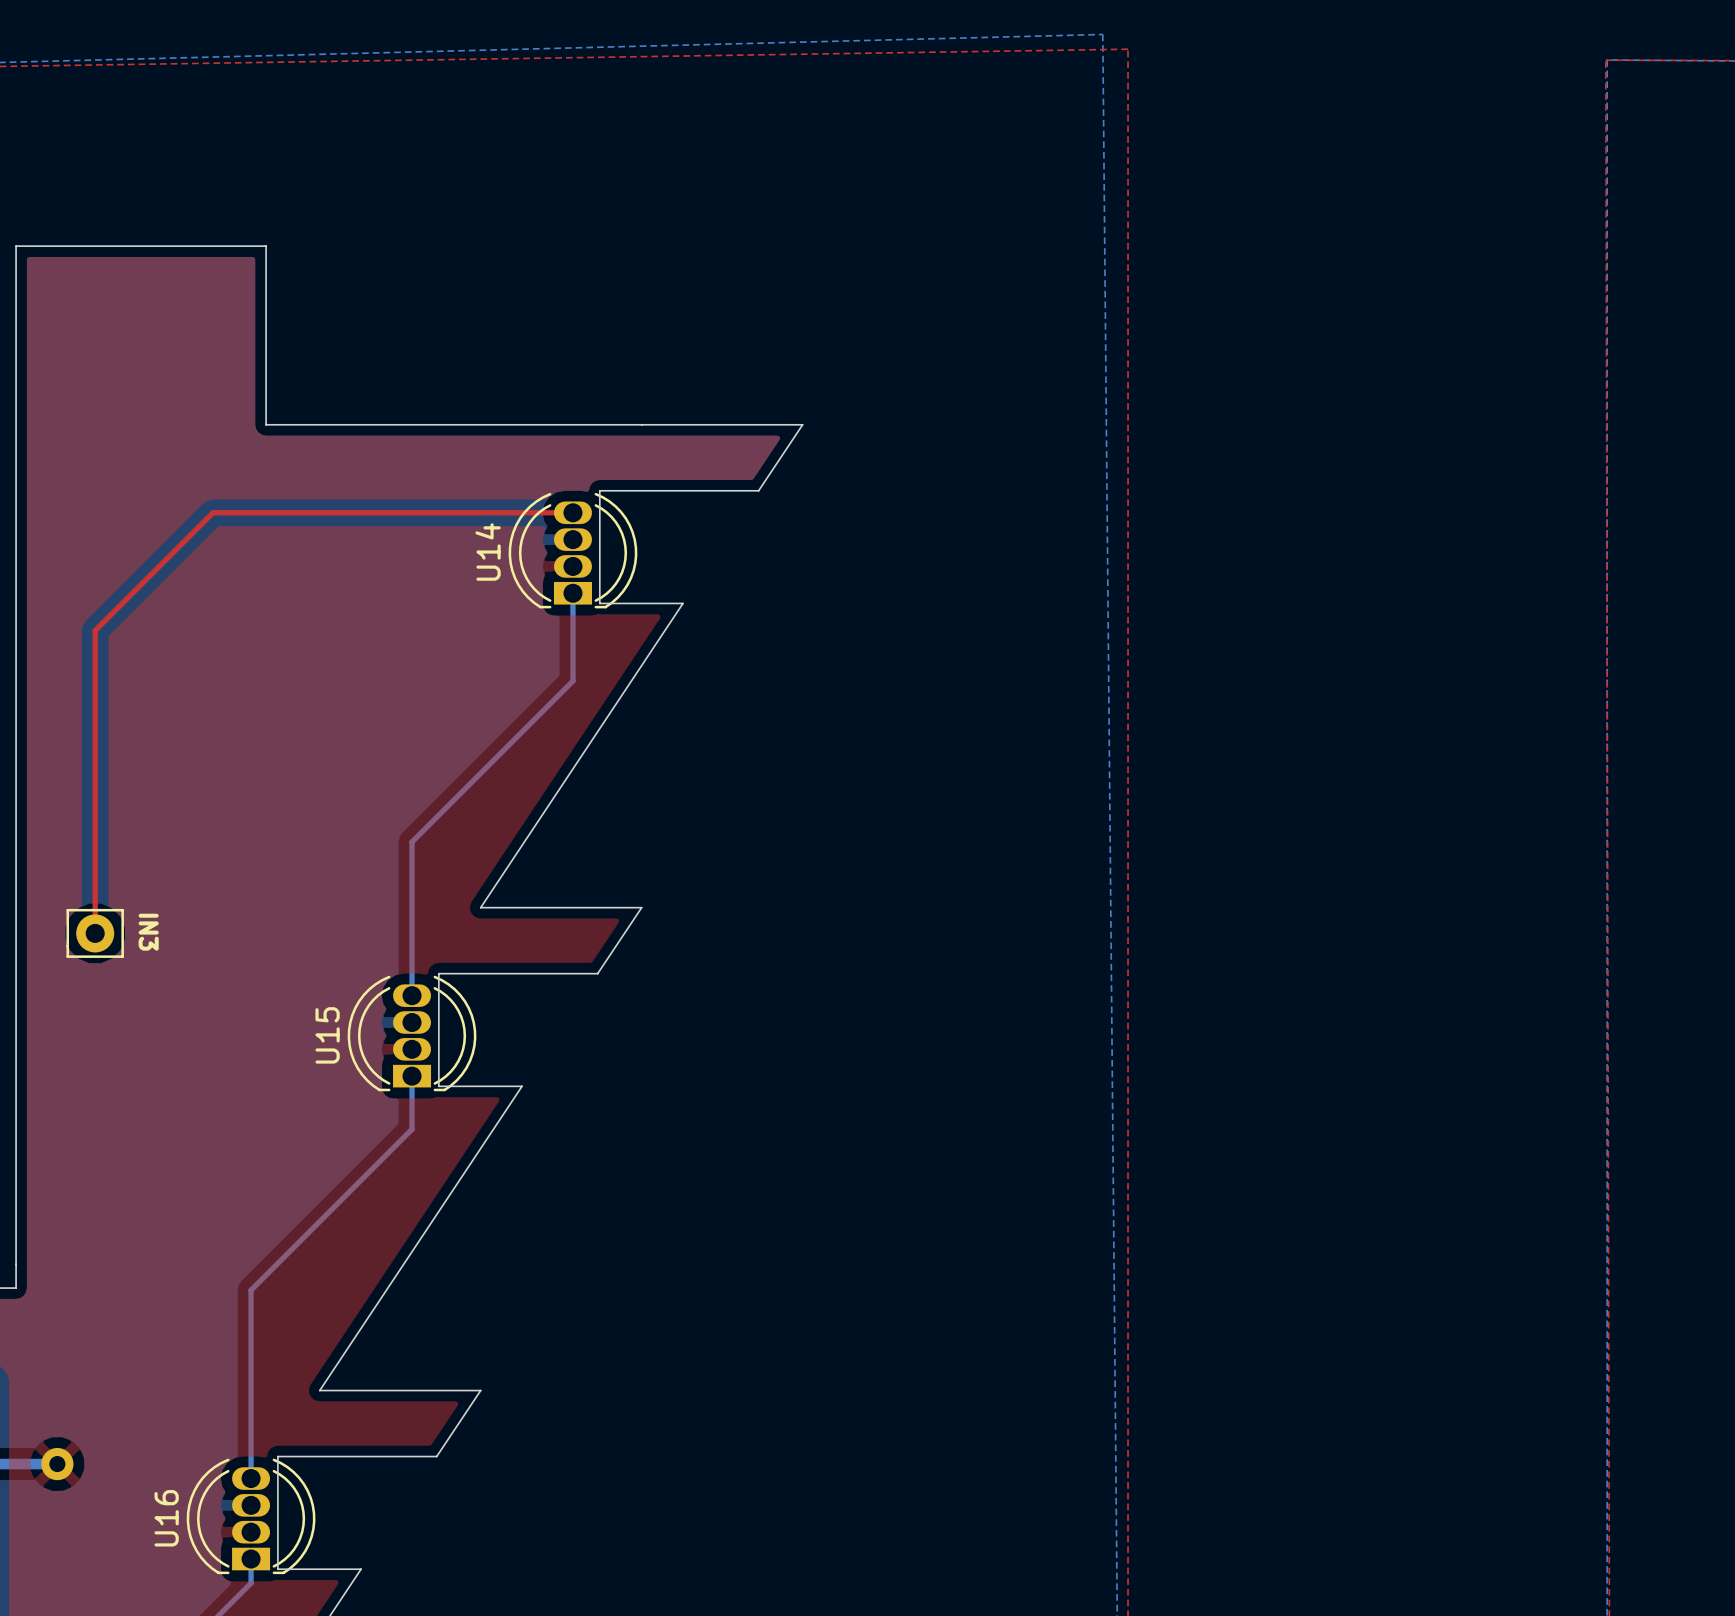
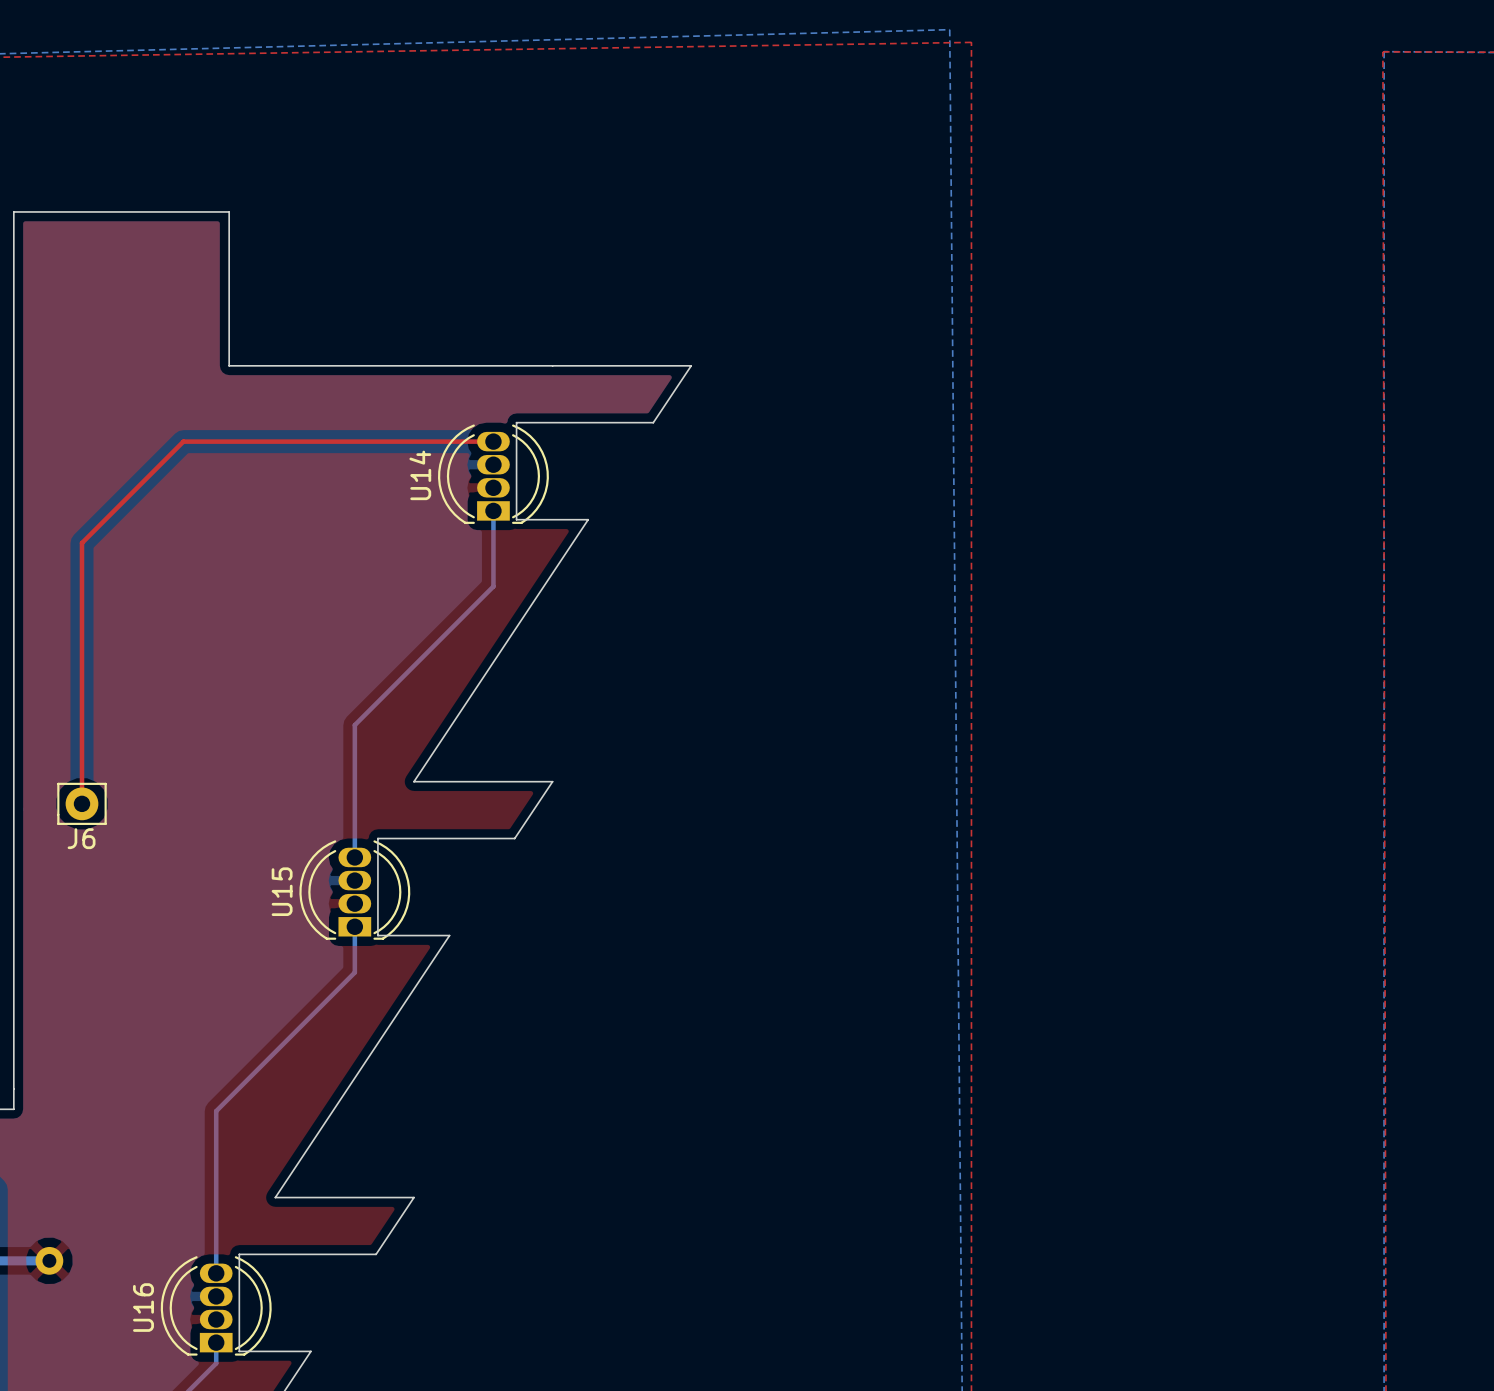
text: IN3 (148, 932) -> none
J6 name: none -> J6 (81, 838)

